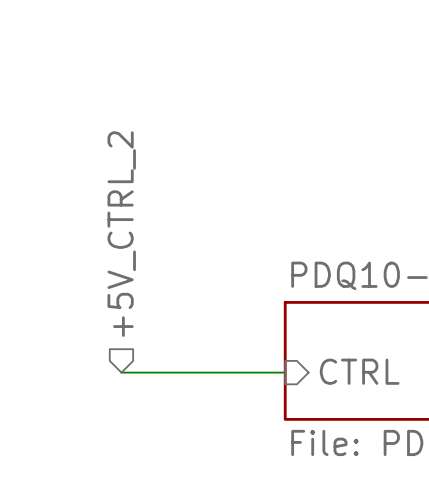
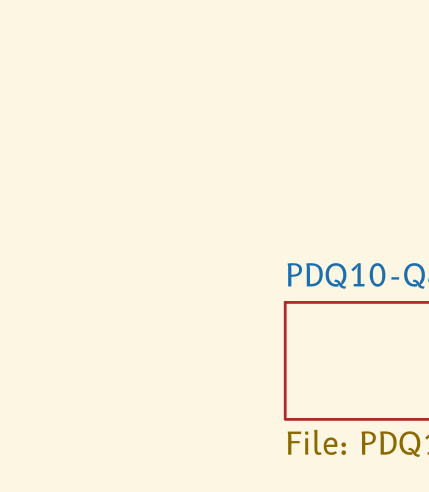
hierarchical label: +5V_CTRL_2 (121, 234) -> none
sheet pin: CTRL (359, 371) -> none
wire: (121, 372) (285, 372) -> none

